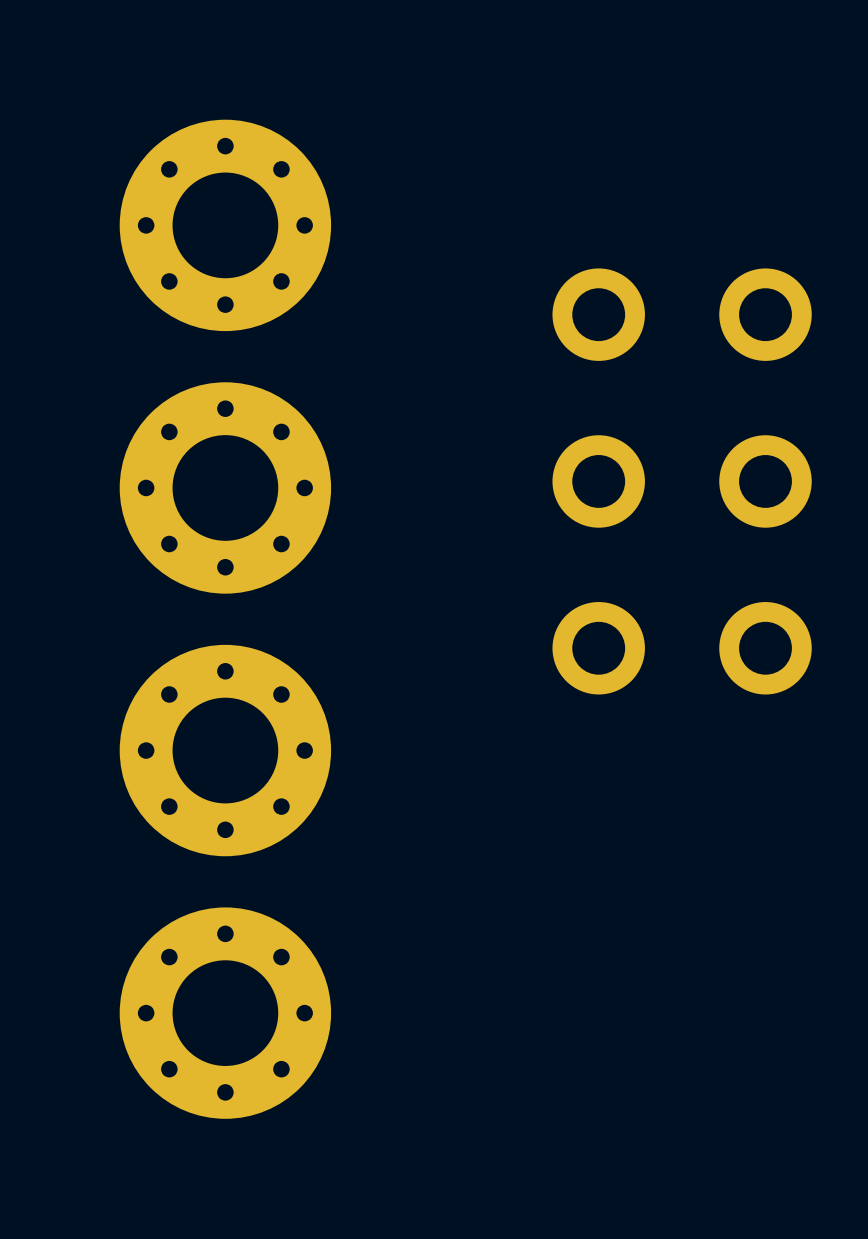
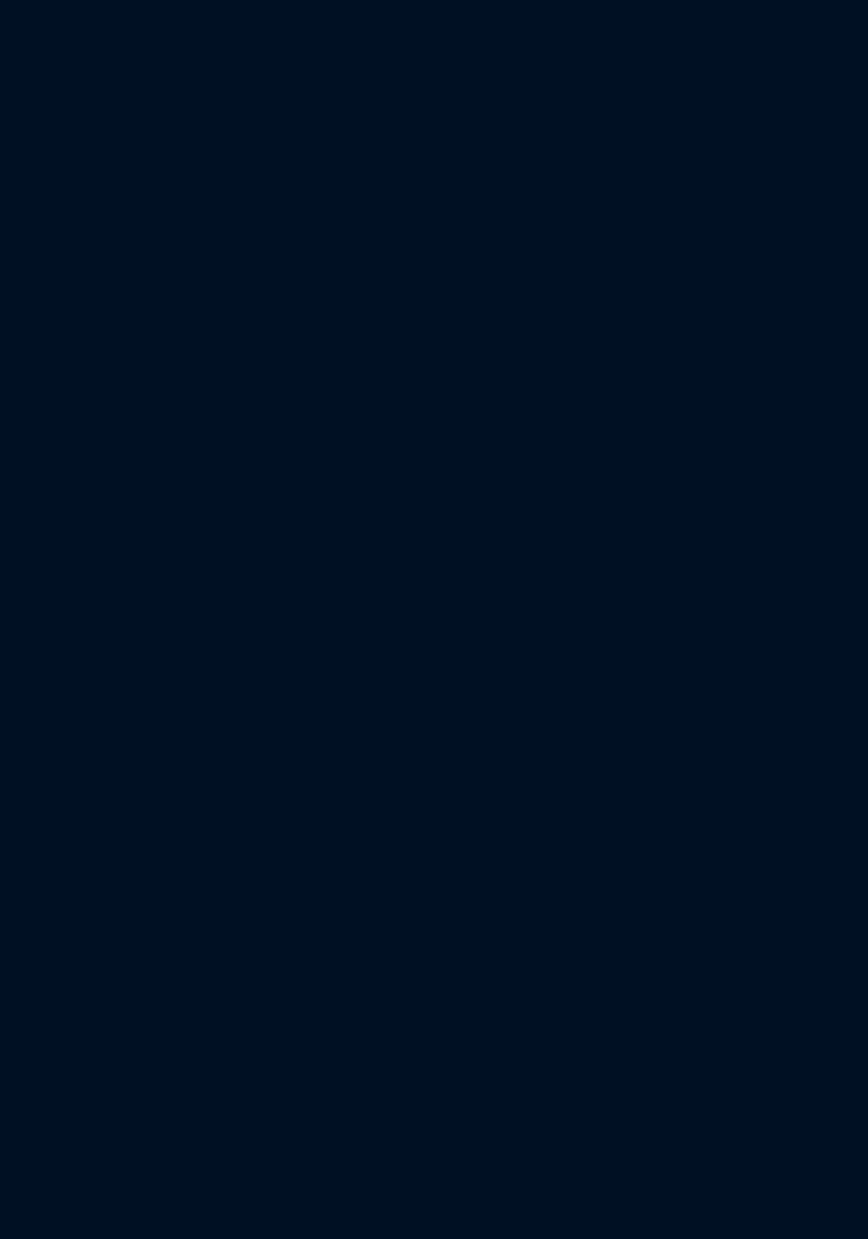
part: (225, 225) -> none
part: (598, 314) -> none
part: (765, 314) -> none
part: (598, 481) -> none
part: (765, 481) -> none
part: (225, 487) -> none
part: (598, 648) -> none
part: (765, 648) -> none
part: (225, 750) -> none
part: (225, 1013) -> none

